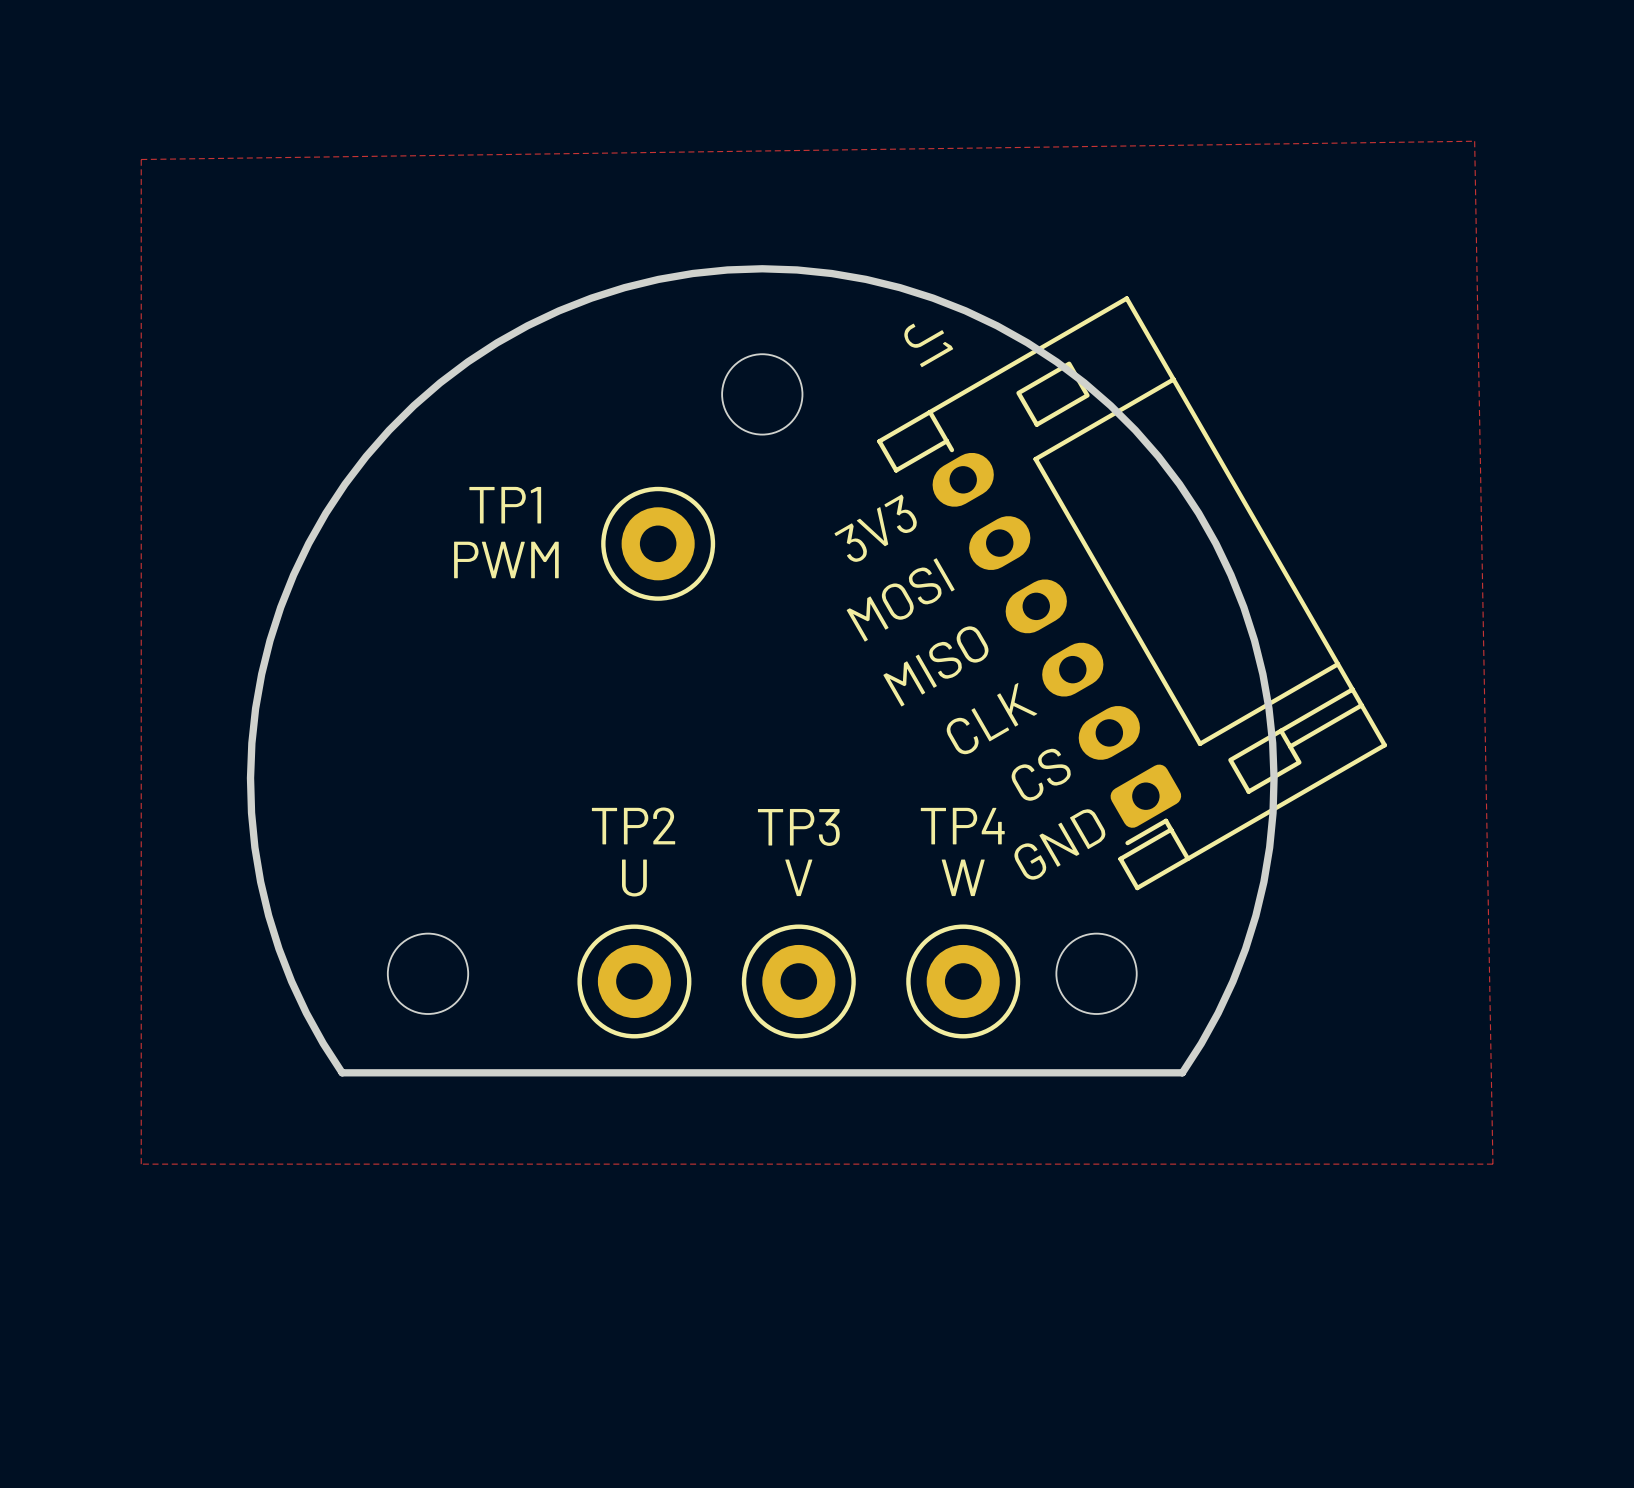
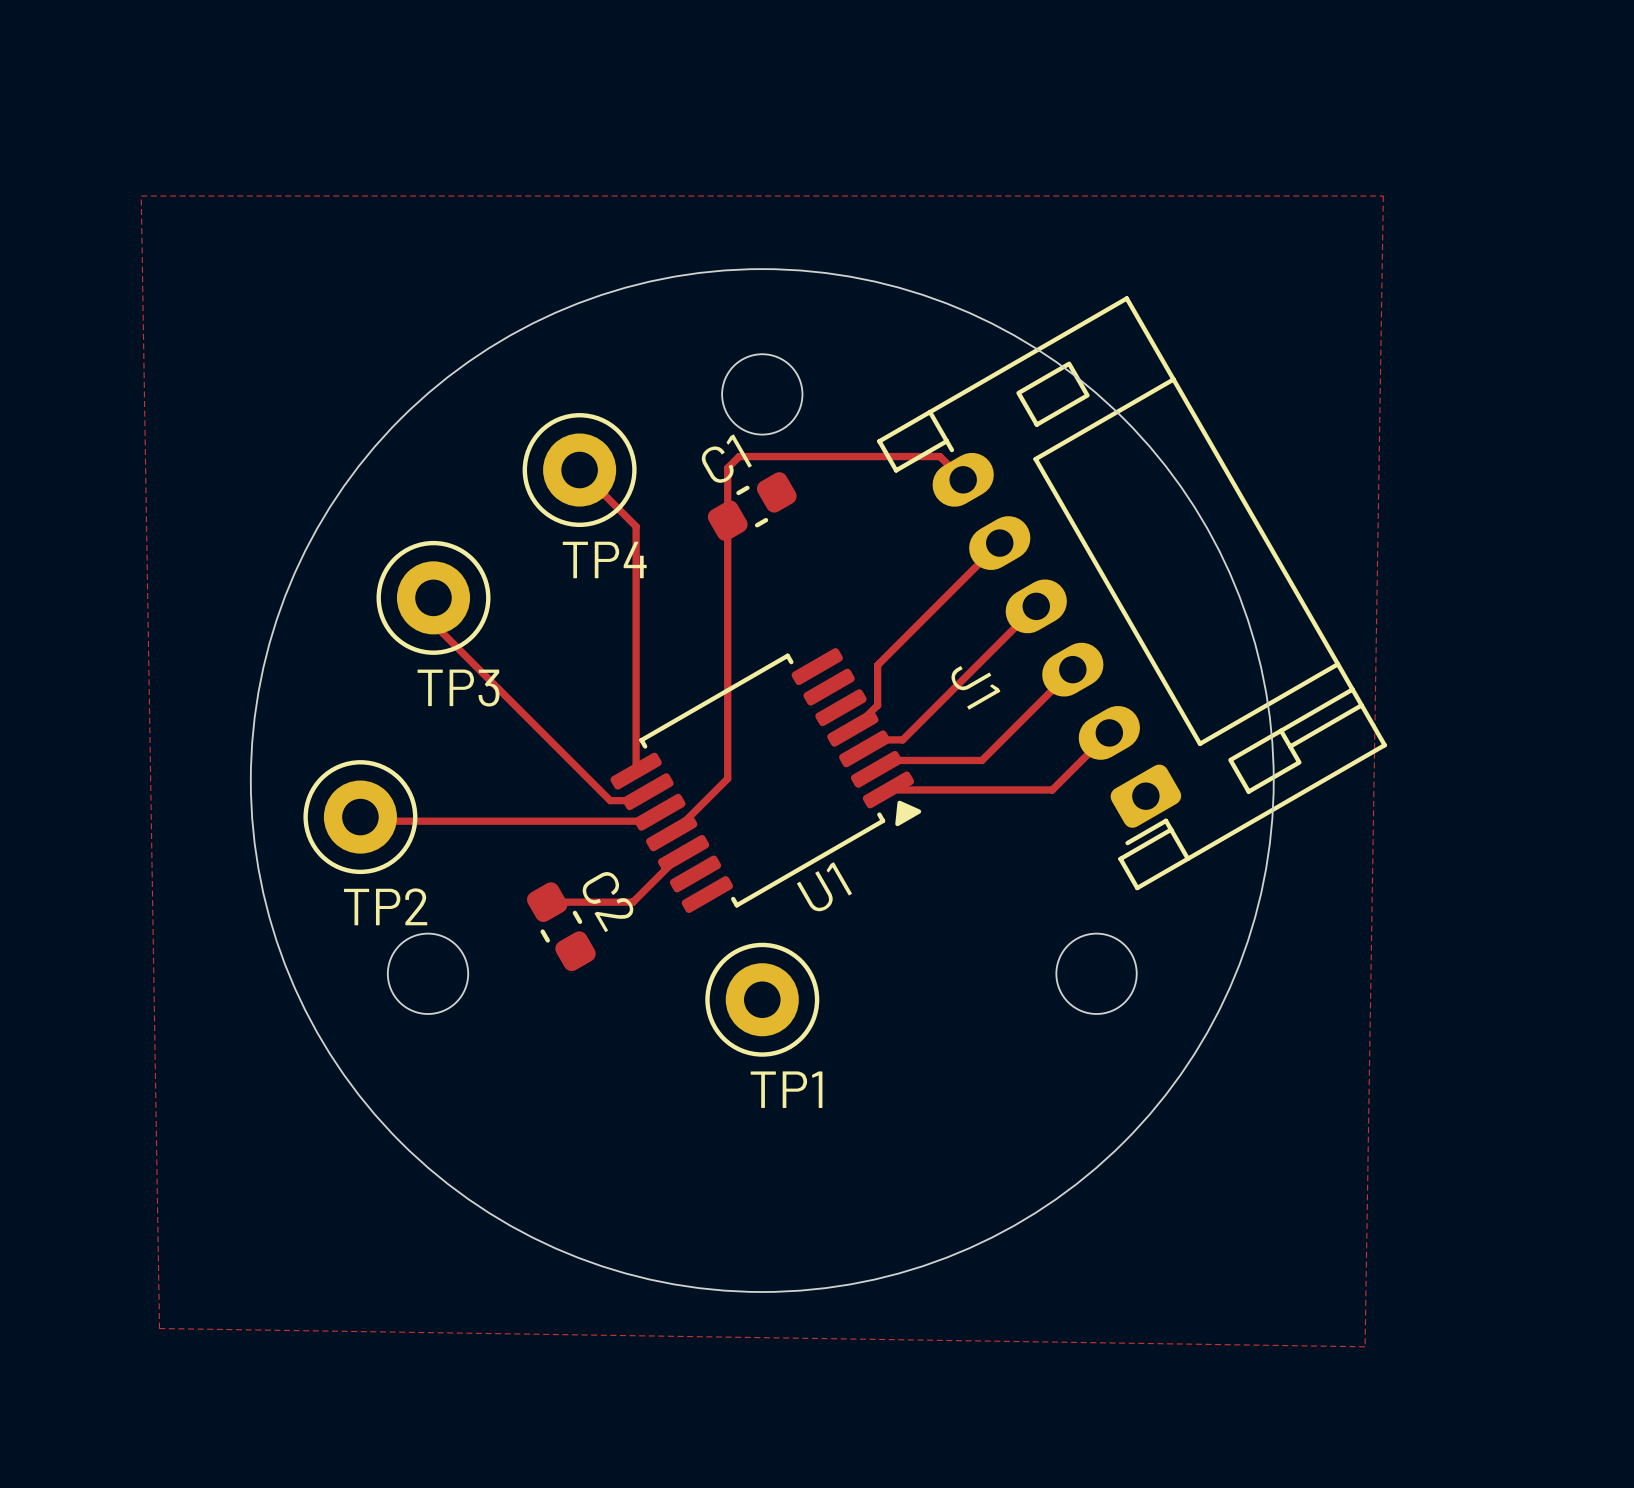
zone outline: (1474, 141) (141, 159) (141, 1164) (1492, 1164) (1474, 141) -> (141, 196) (159, 1328) (1365, 1346) (1383, 196) (141, 196)
round board edge: none -> [249, 268, 1275, 1293]
J1 name position: J1 (928, 345) -> J1 (975, 687)
track: none -> (579, 470) (636, 526) (636, 771)
track: none -> (963, 479) (939, 456) (739, 456) (727, 468) (727, 778) (672, 833)
TP1 name position: TP1 (505, 505) -> TP1 (786, 1089)
C1: none -> (752, 506)
text: 3V3 (875, 528) -> none
TP1 position: (658, 543) -> (762, 999)
track: none -> (999, 543) (877, 665) (877, 705) (853, 729)
TP1 value: PWM (506, 559) -> none
track: none -> (433, 597) (433, 623) (610, 800) (639, 800) (647, 791)
text: MOSI (900, 599) -> none
track: none -> (1036, 606) (902, 739) (873, 739) (864, 748)
text: MISO (935, 666) -> none
track: none -> (1072, 669) (981, 760) (885, 760) (876, 769)
text: CLK (992, 718) -> none
track: none -> (1109, 732) (1052, 789) (888, 789)
text: CS (1041, 774) -> none
U1: none -> (765, 780)
track: none -> (659, 812) (650, 821) (364, 821) (360, 817)
TP2 name position: TP2 (633, 825) -> TP2 (385, 906)
TP4 name position: TP4 (962, 826) -> TP4 (604, 559)
TP3 name position: TP3 (798, 827) -> TP3 (458, 688)
text: GND (1060, 844) -> none
track: none -> (682, 852) (632, 902) (547, 902)
TP3 value: V (798, 877) -> none
TP4 value: W (963, 877) -> none
TP2 value: U (634, 878) -> none
C2: none -> (561, 926)
TP2 position: (634, 981) -> (360, 817)
TP3 position: (798, 981) -> (433, 597)
TP4 position: (963, 981) -> (579, 470)
board edge: (342, 1072) (1182, 1072) (1218, 1013) (1245, 949) (1263, 881) (1269, 847) (1274, 778) (1272, 743) (1262, 674) (1243, 607) (1215, 543) (1179, 484) (1135, 430) (1110, 405) (1084, 382) (1027, 342) (965, 310) (933, 298) (866, 279) (831, 273) (762, 268) (727, 269) (658, 279) (591, 298) (558, 310) (527, 325) (467, 361) (413, 405) (389, 430) (366, 456) (325, 513) (293, 574) (280, 607) (261, 674) (255, 708) (250, 778) (251, 812) (260, 881) (279, 949) (291, 981) (306, 1013) (342, 1072) -> none

